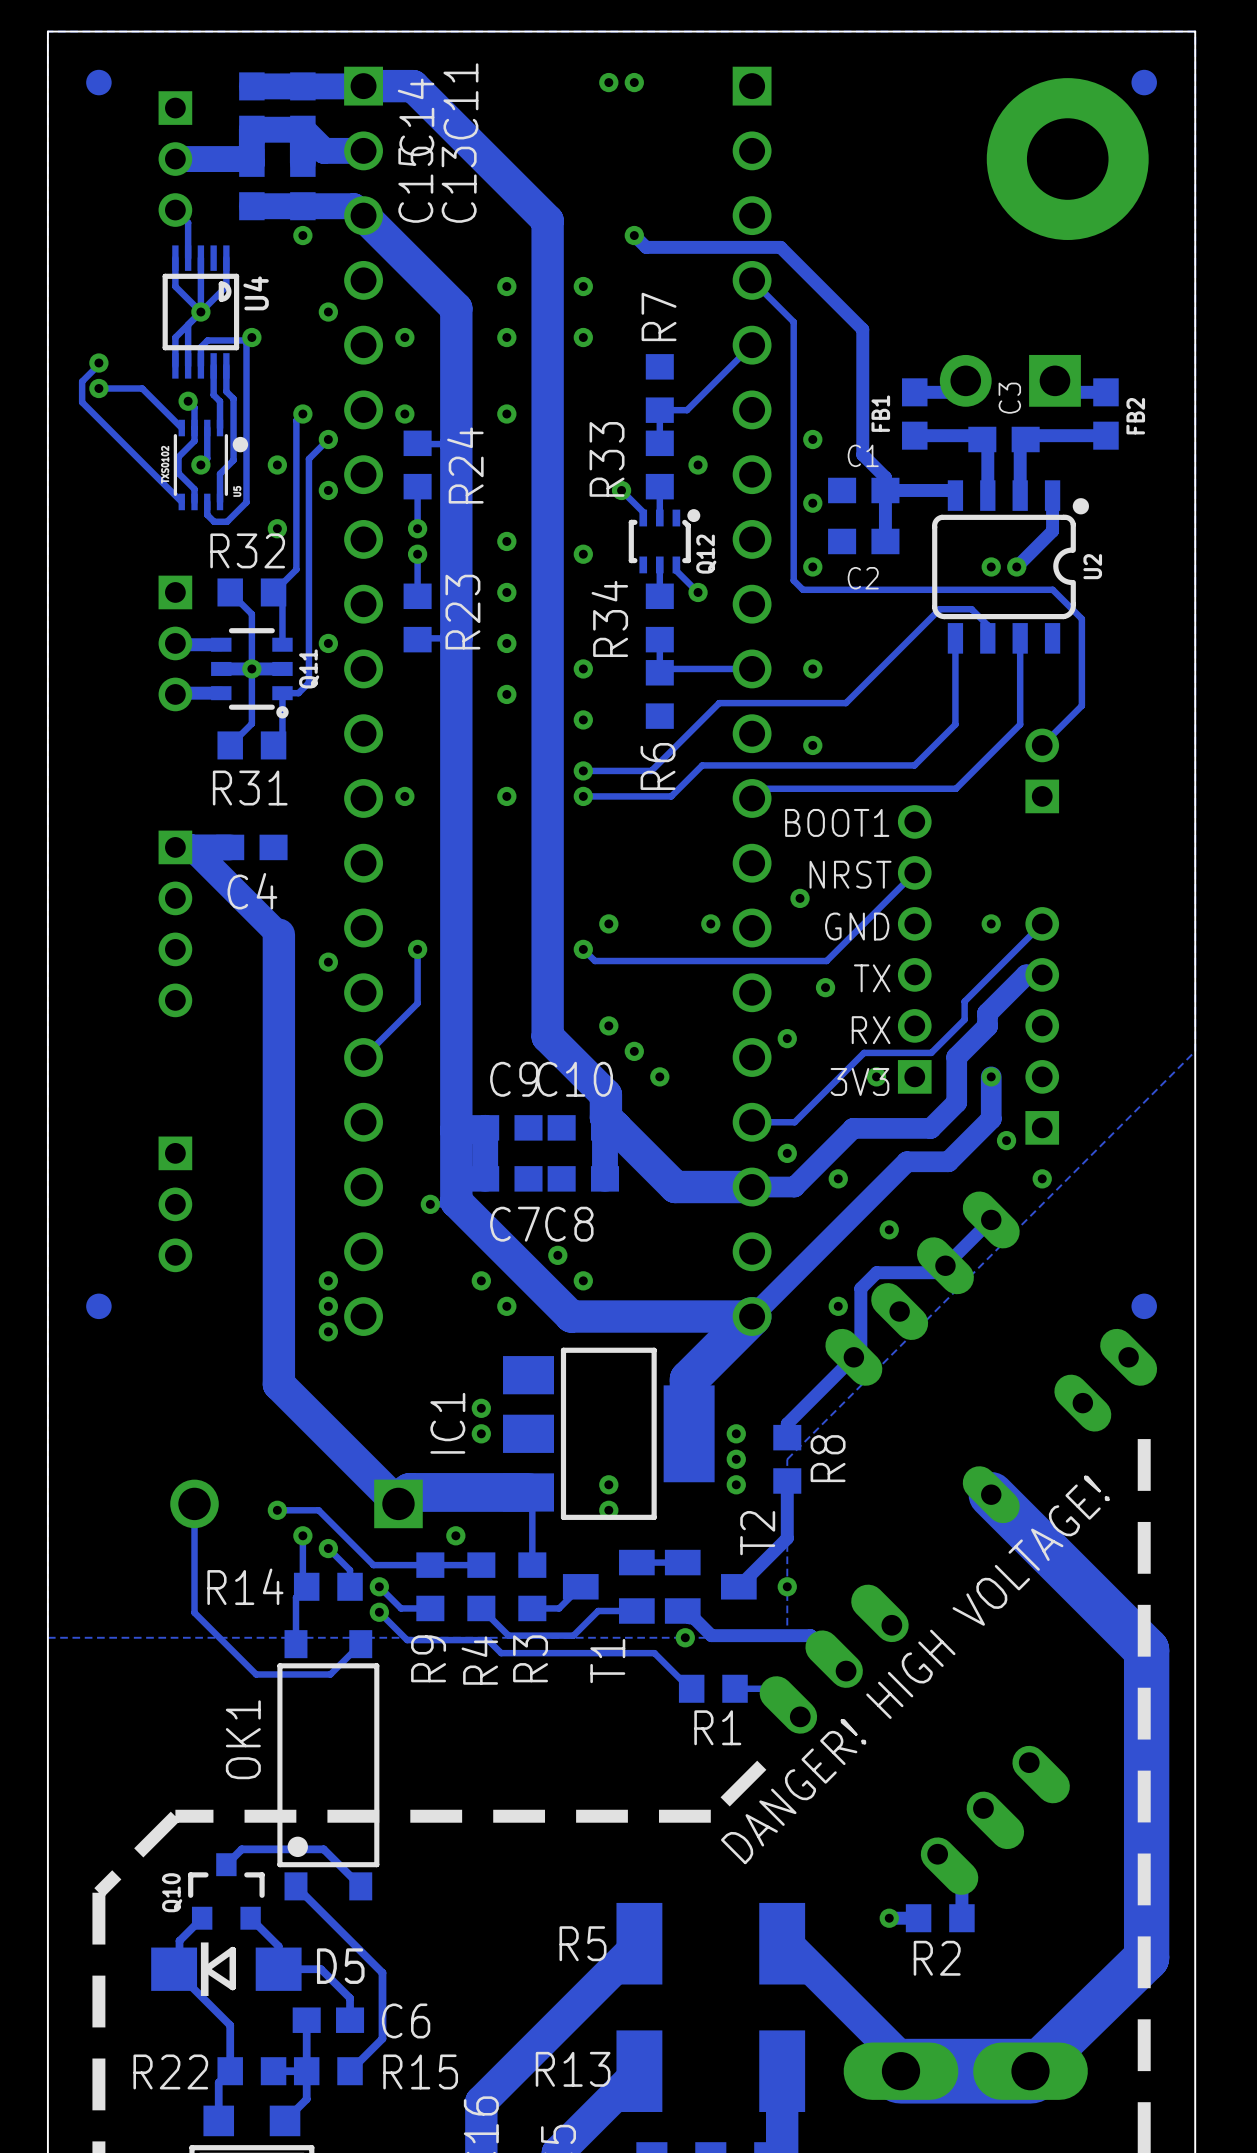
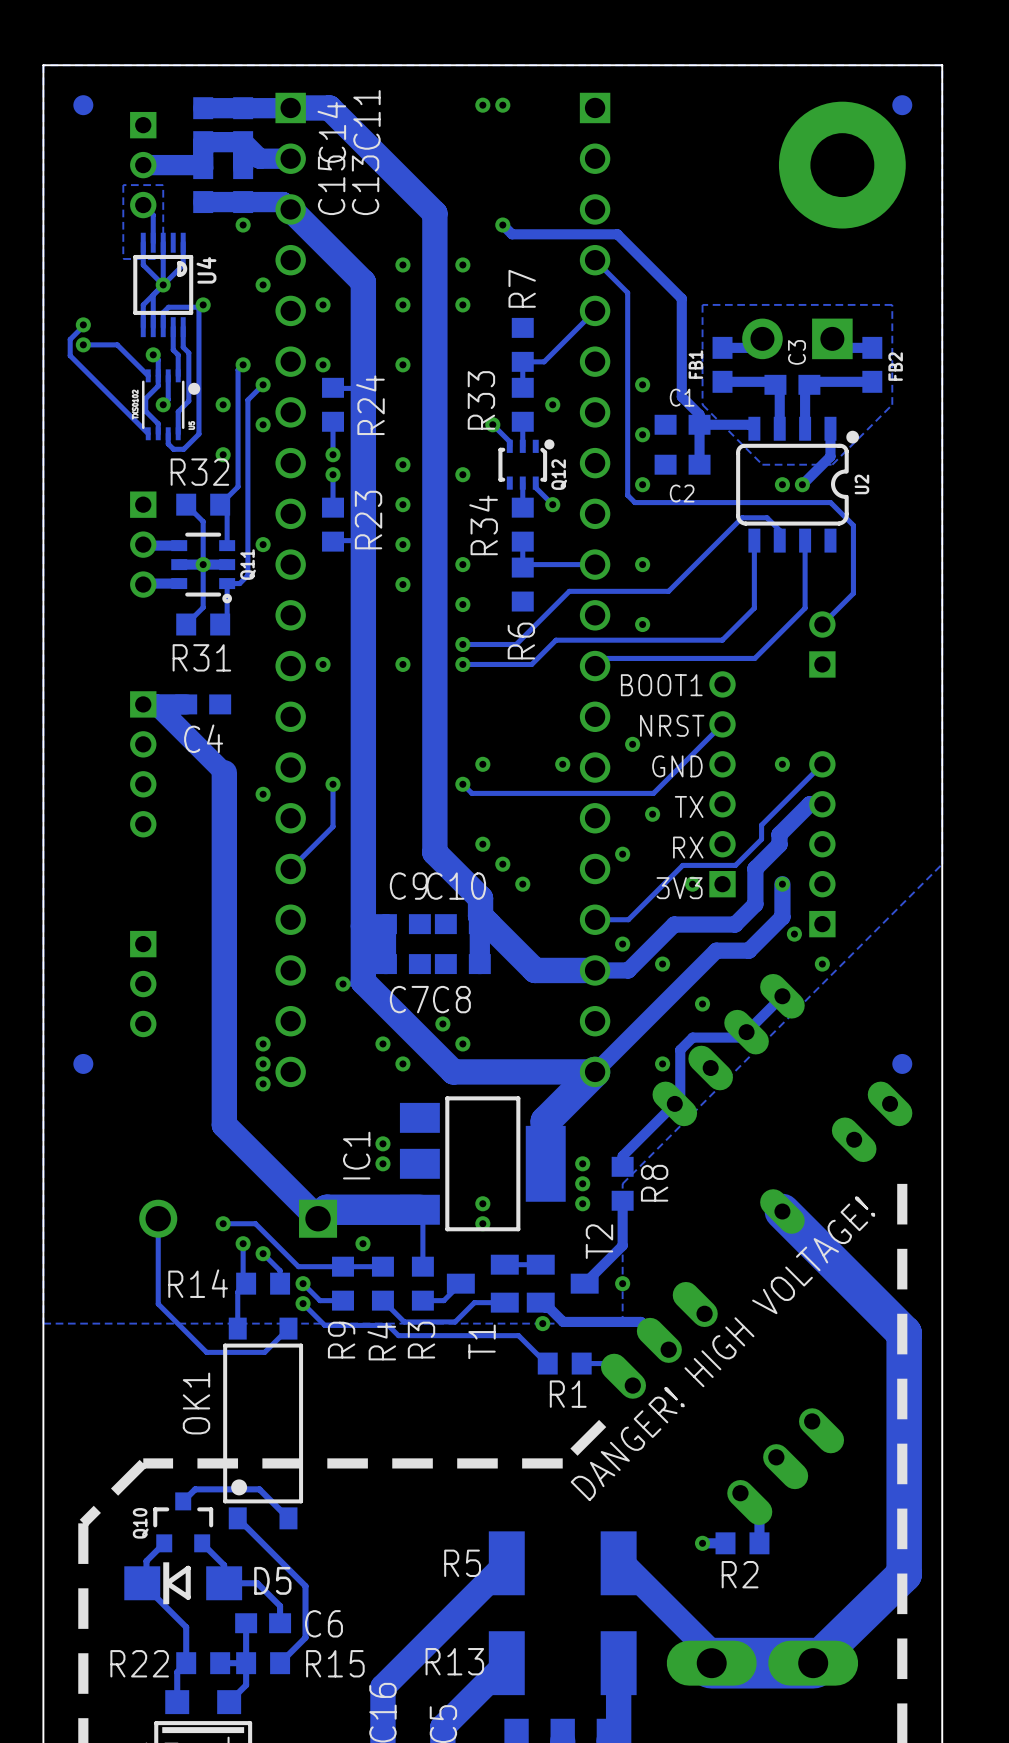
zone outline: none -> (163, 185) (123, 185) (123, 258) (163, 258) (163, 185)
zone outline: none -> (892, 304) (702, 304) (702, 404) (762, 464) (832, 464) (892, 404) (892, 304)

